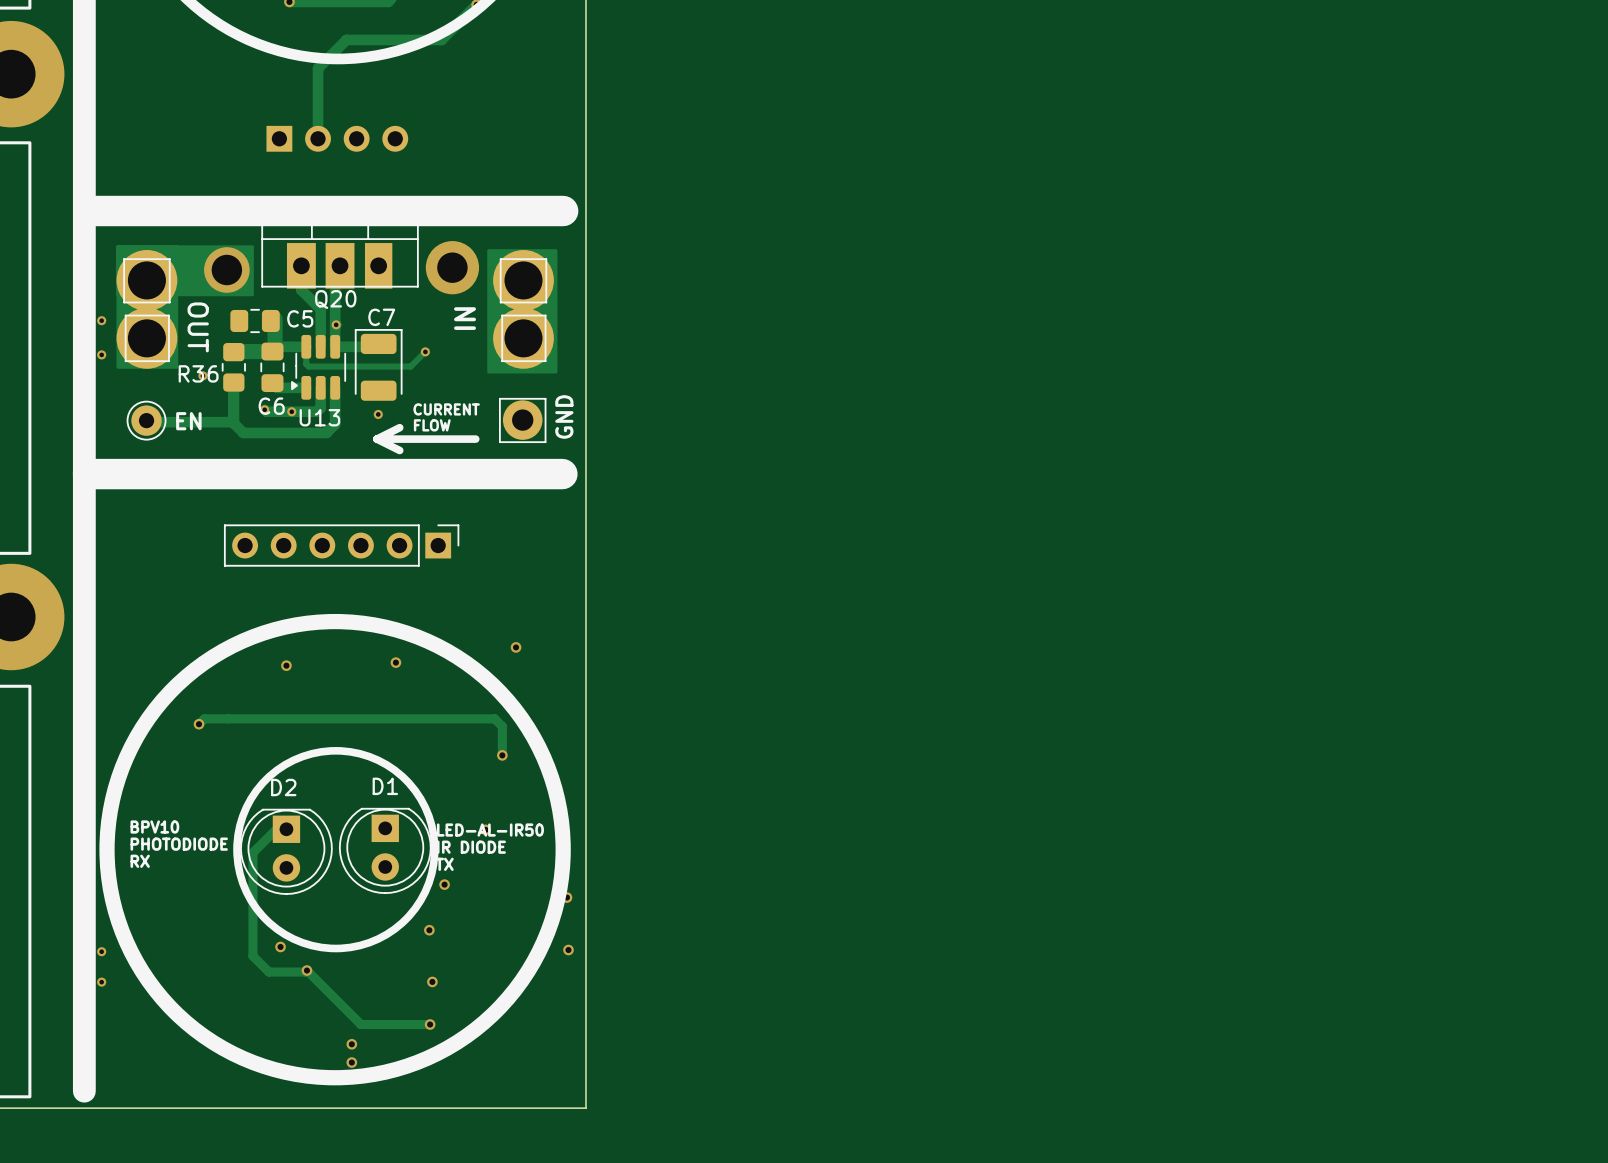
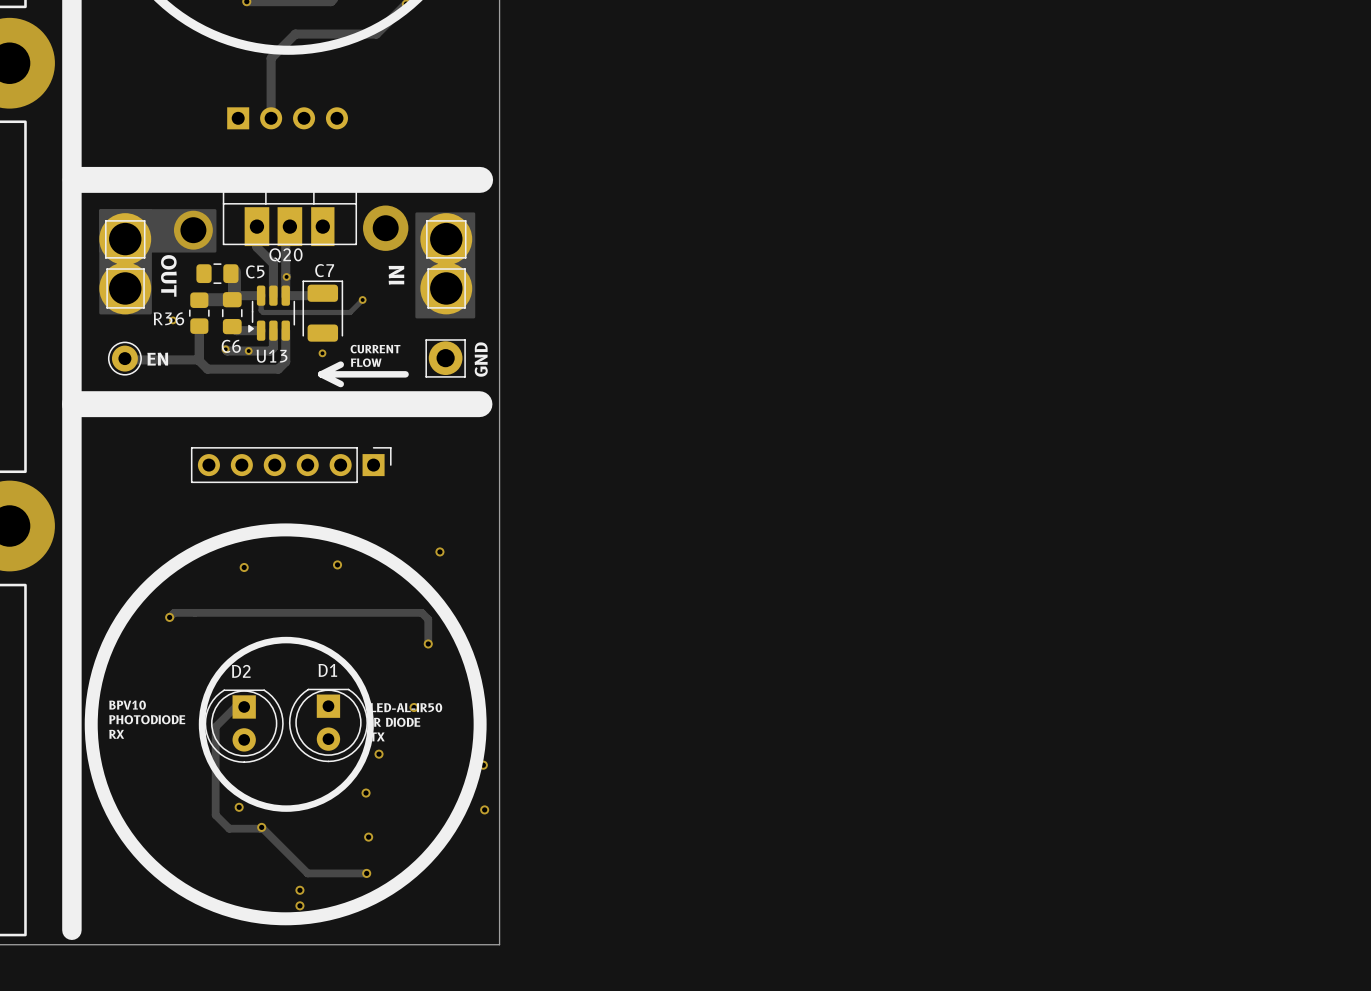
via: (101, 320) -> none
via: (101, 354) -> none
via: (101, 951) -> none
via: (101, 982) -> none

